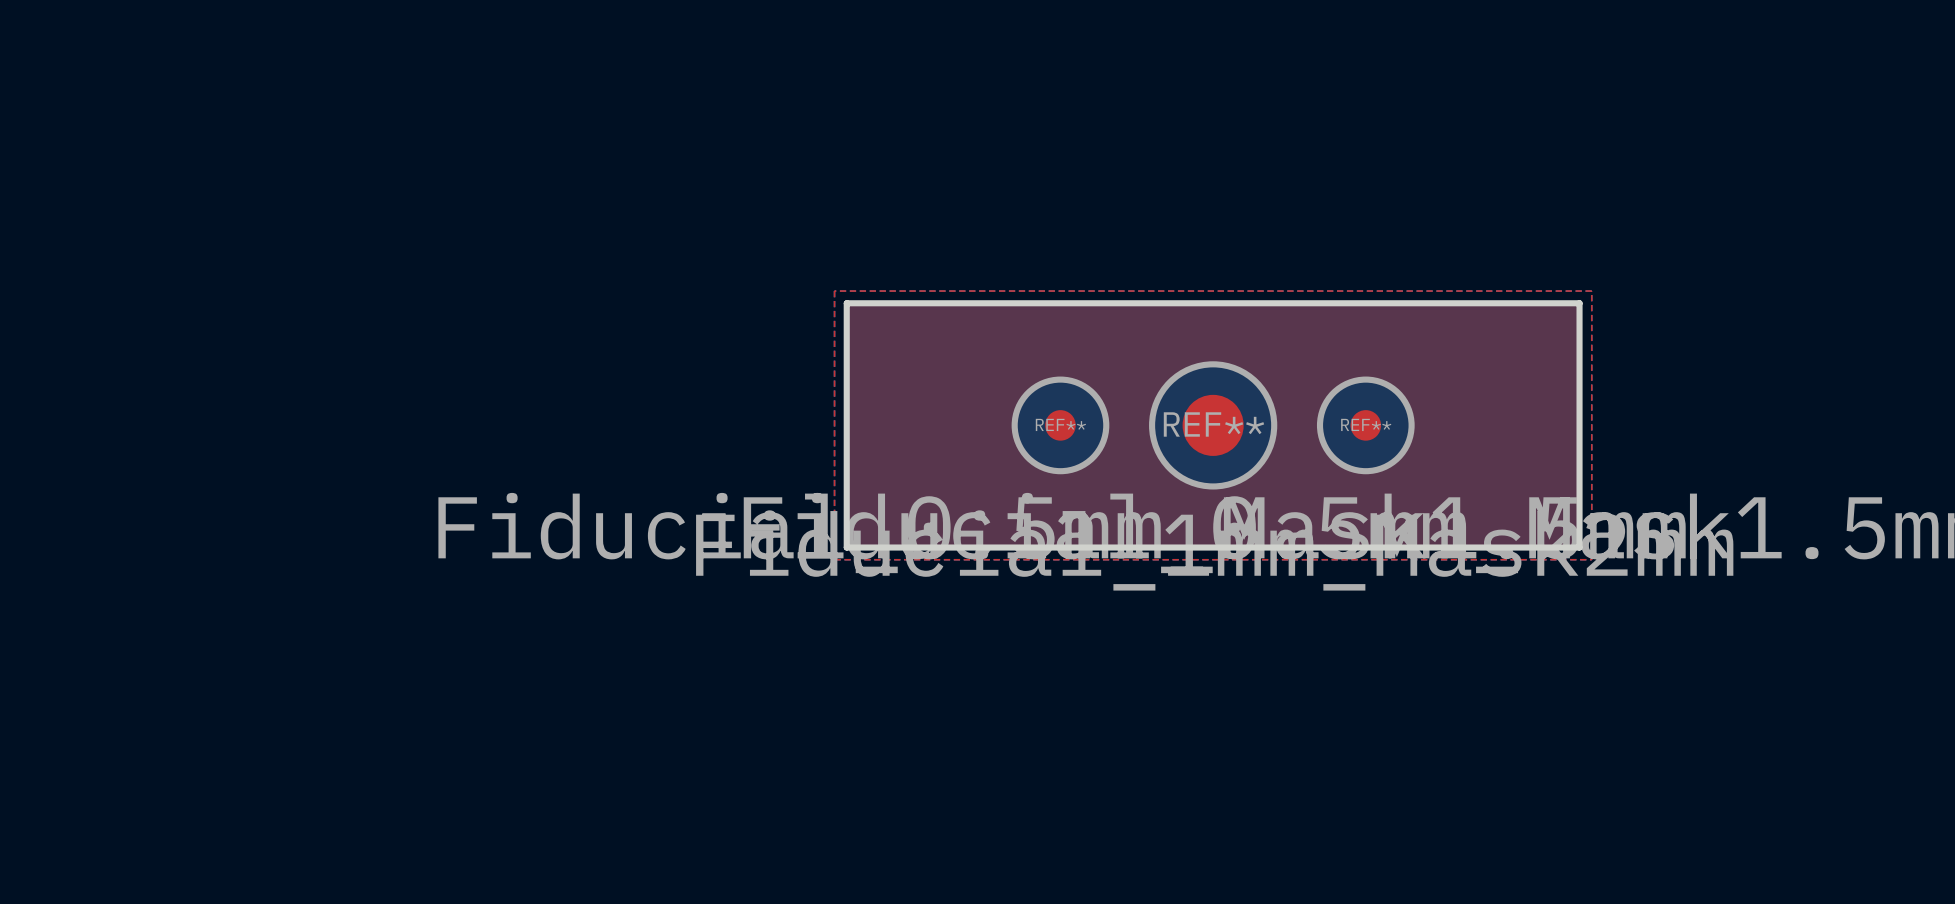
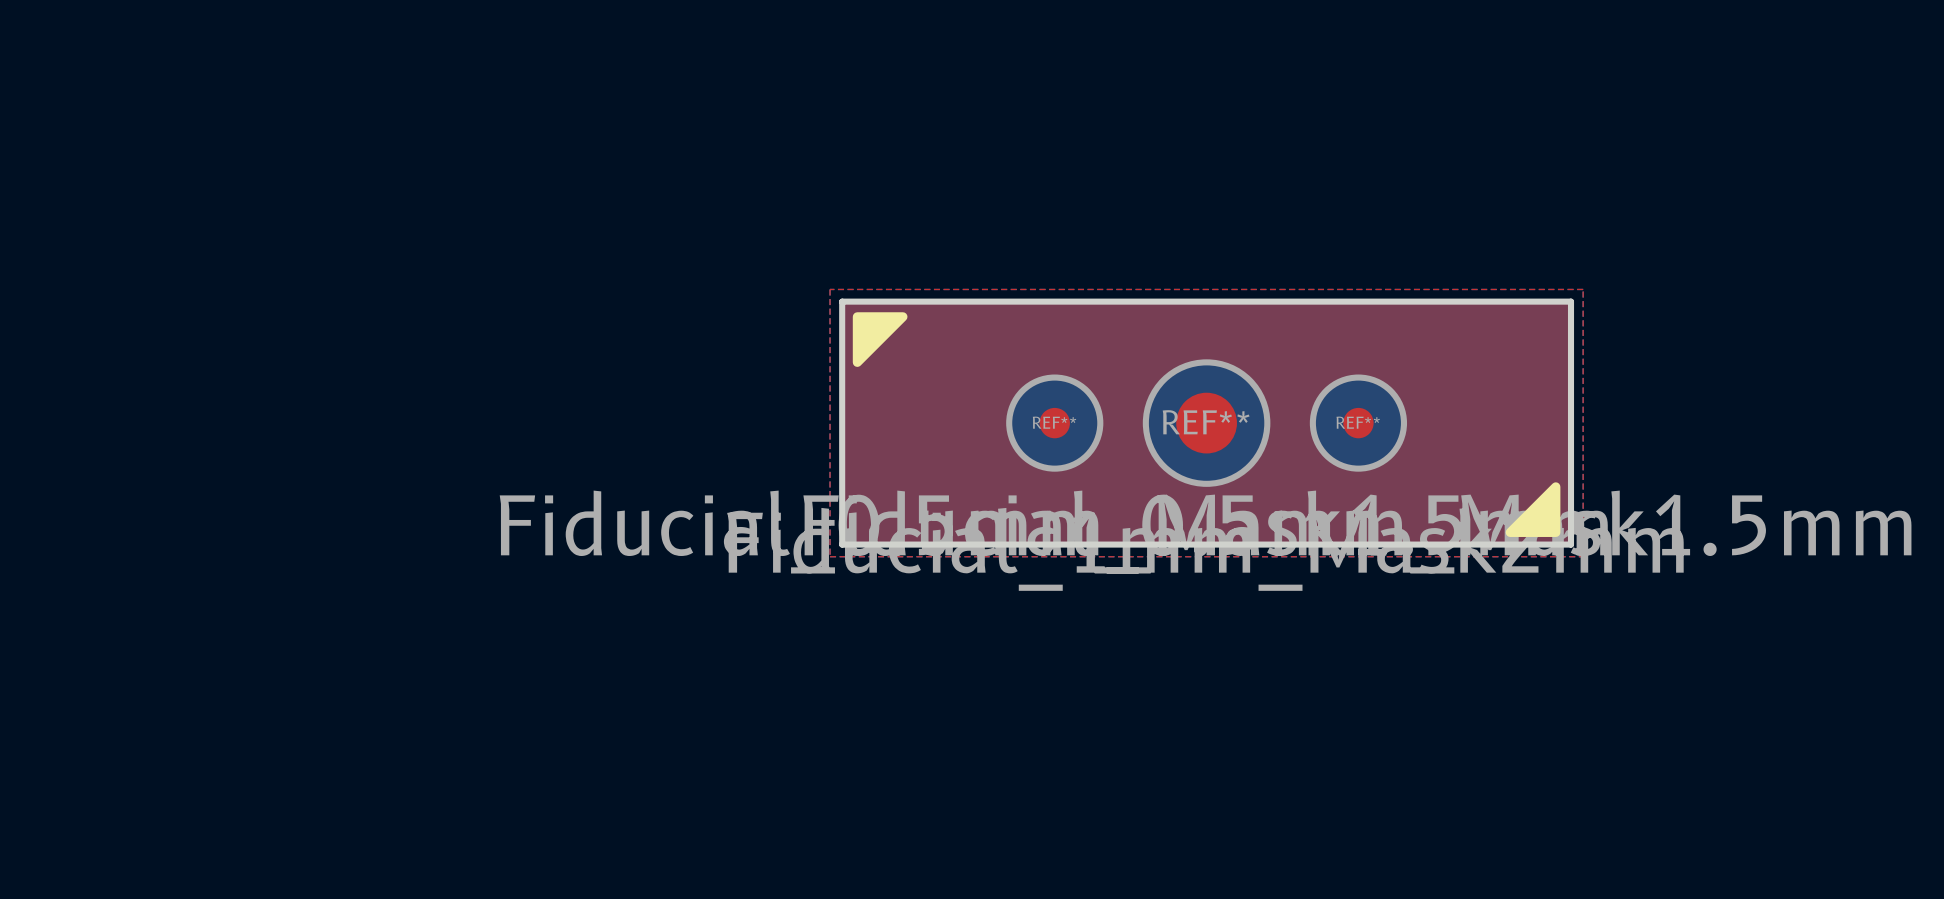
drawing: none -> [852, 312, 908, 367]
drawing: none -> [1505, 482, 1561, 537]

